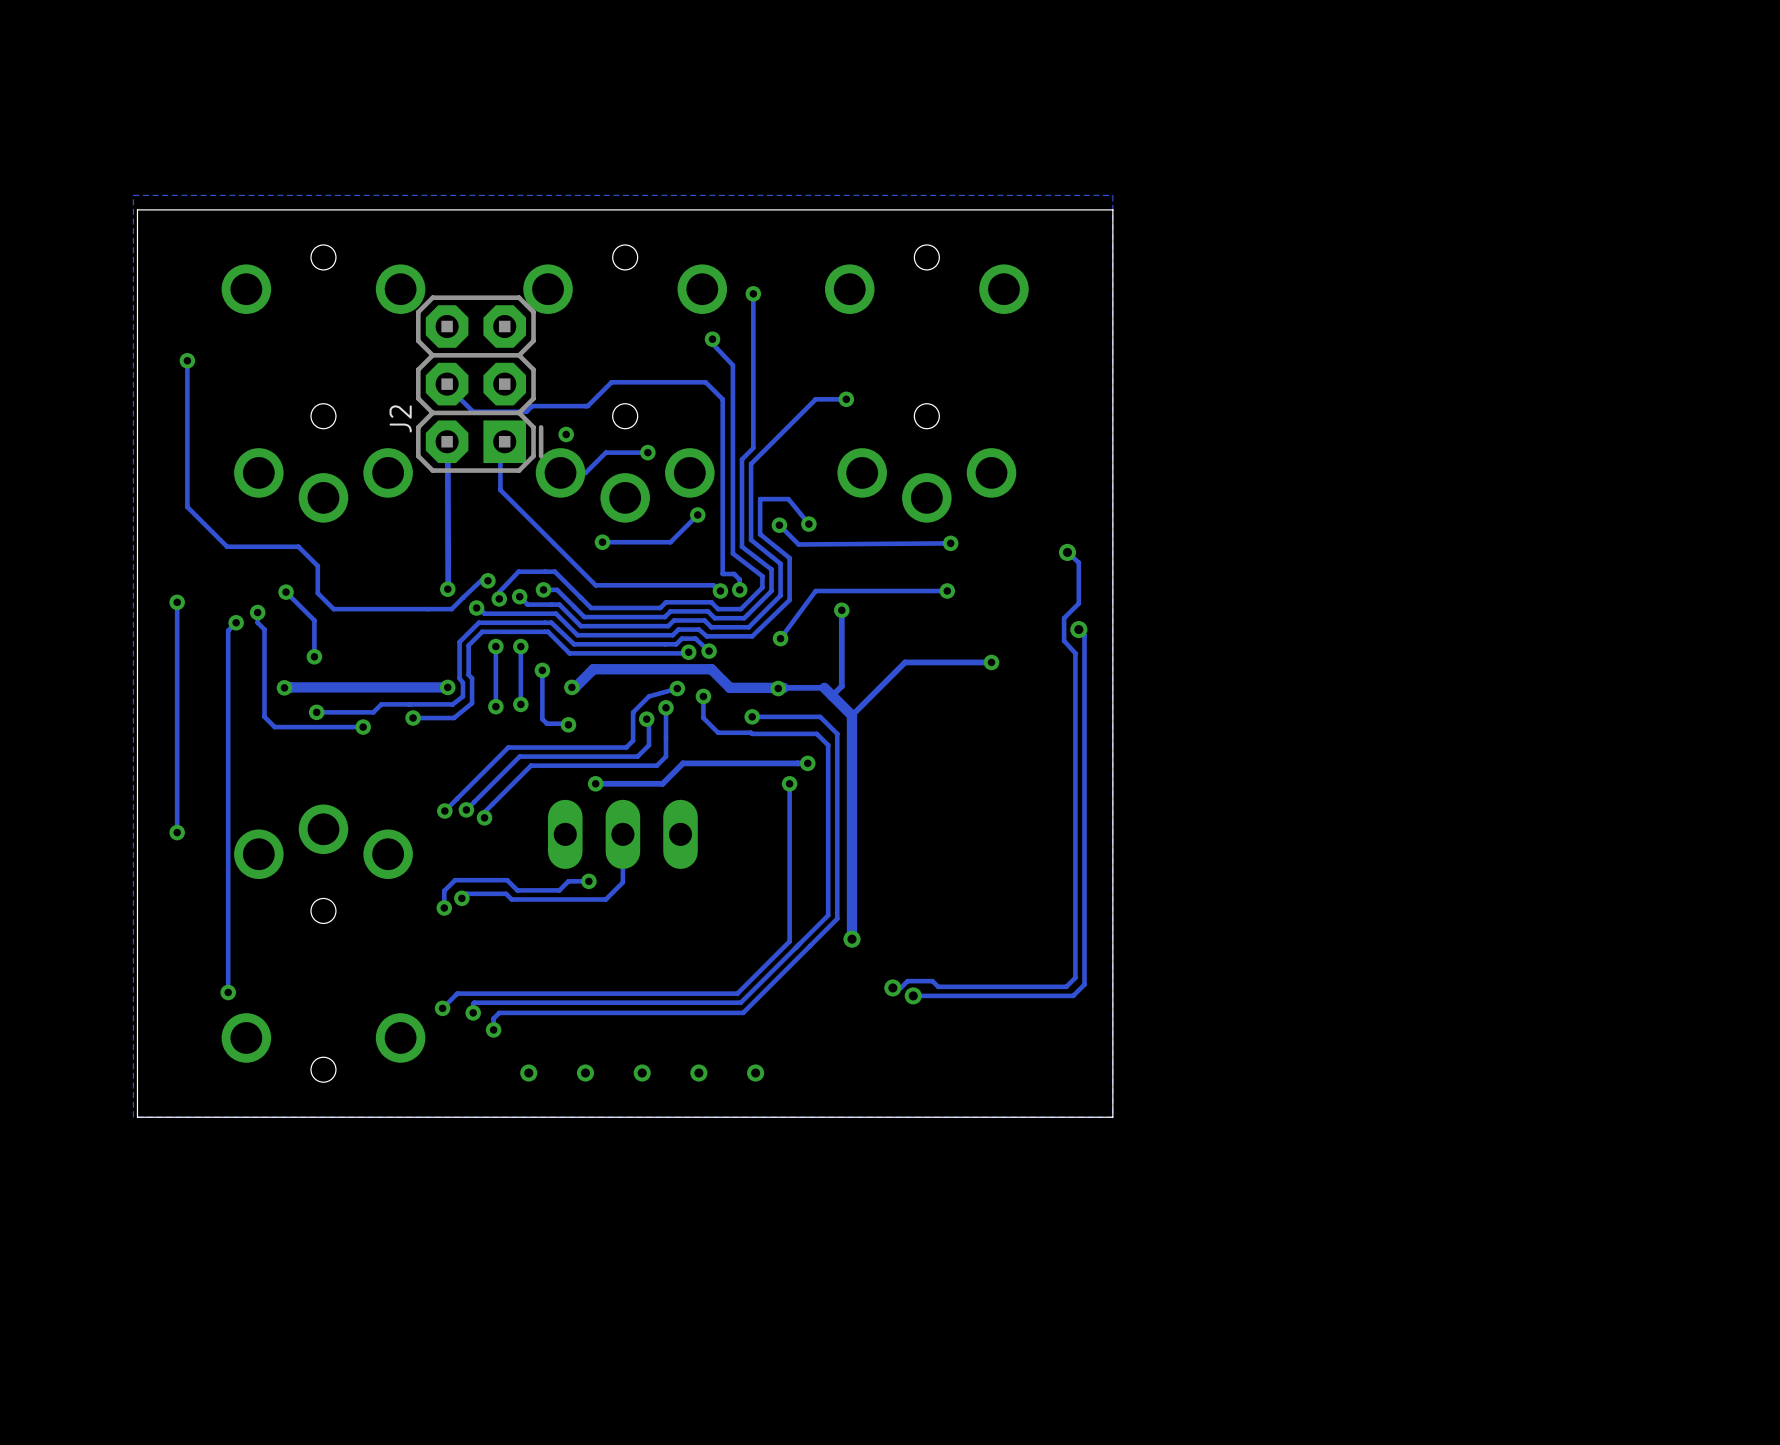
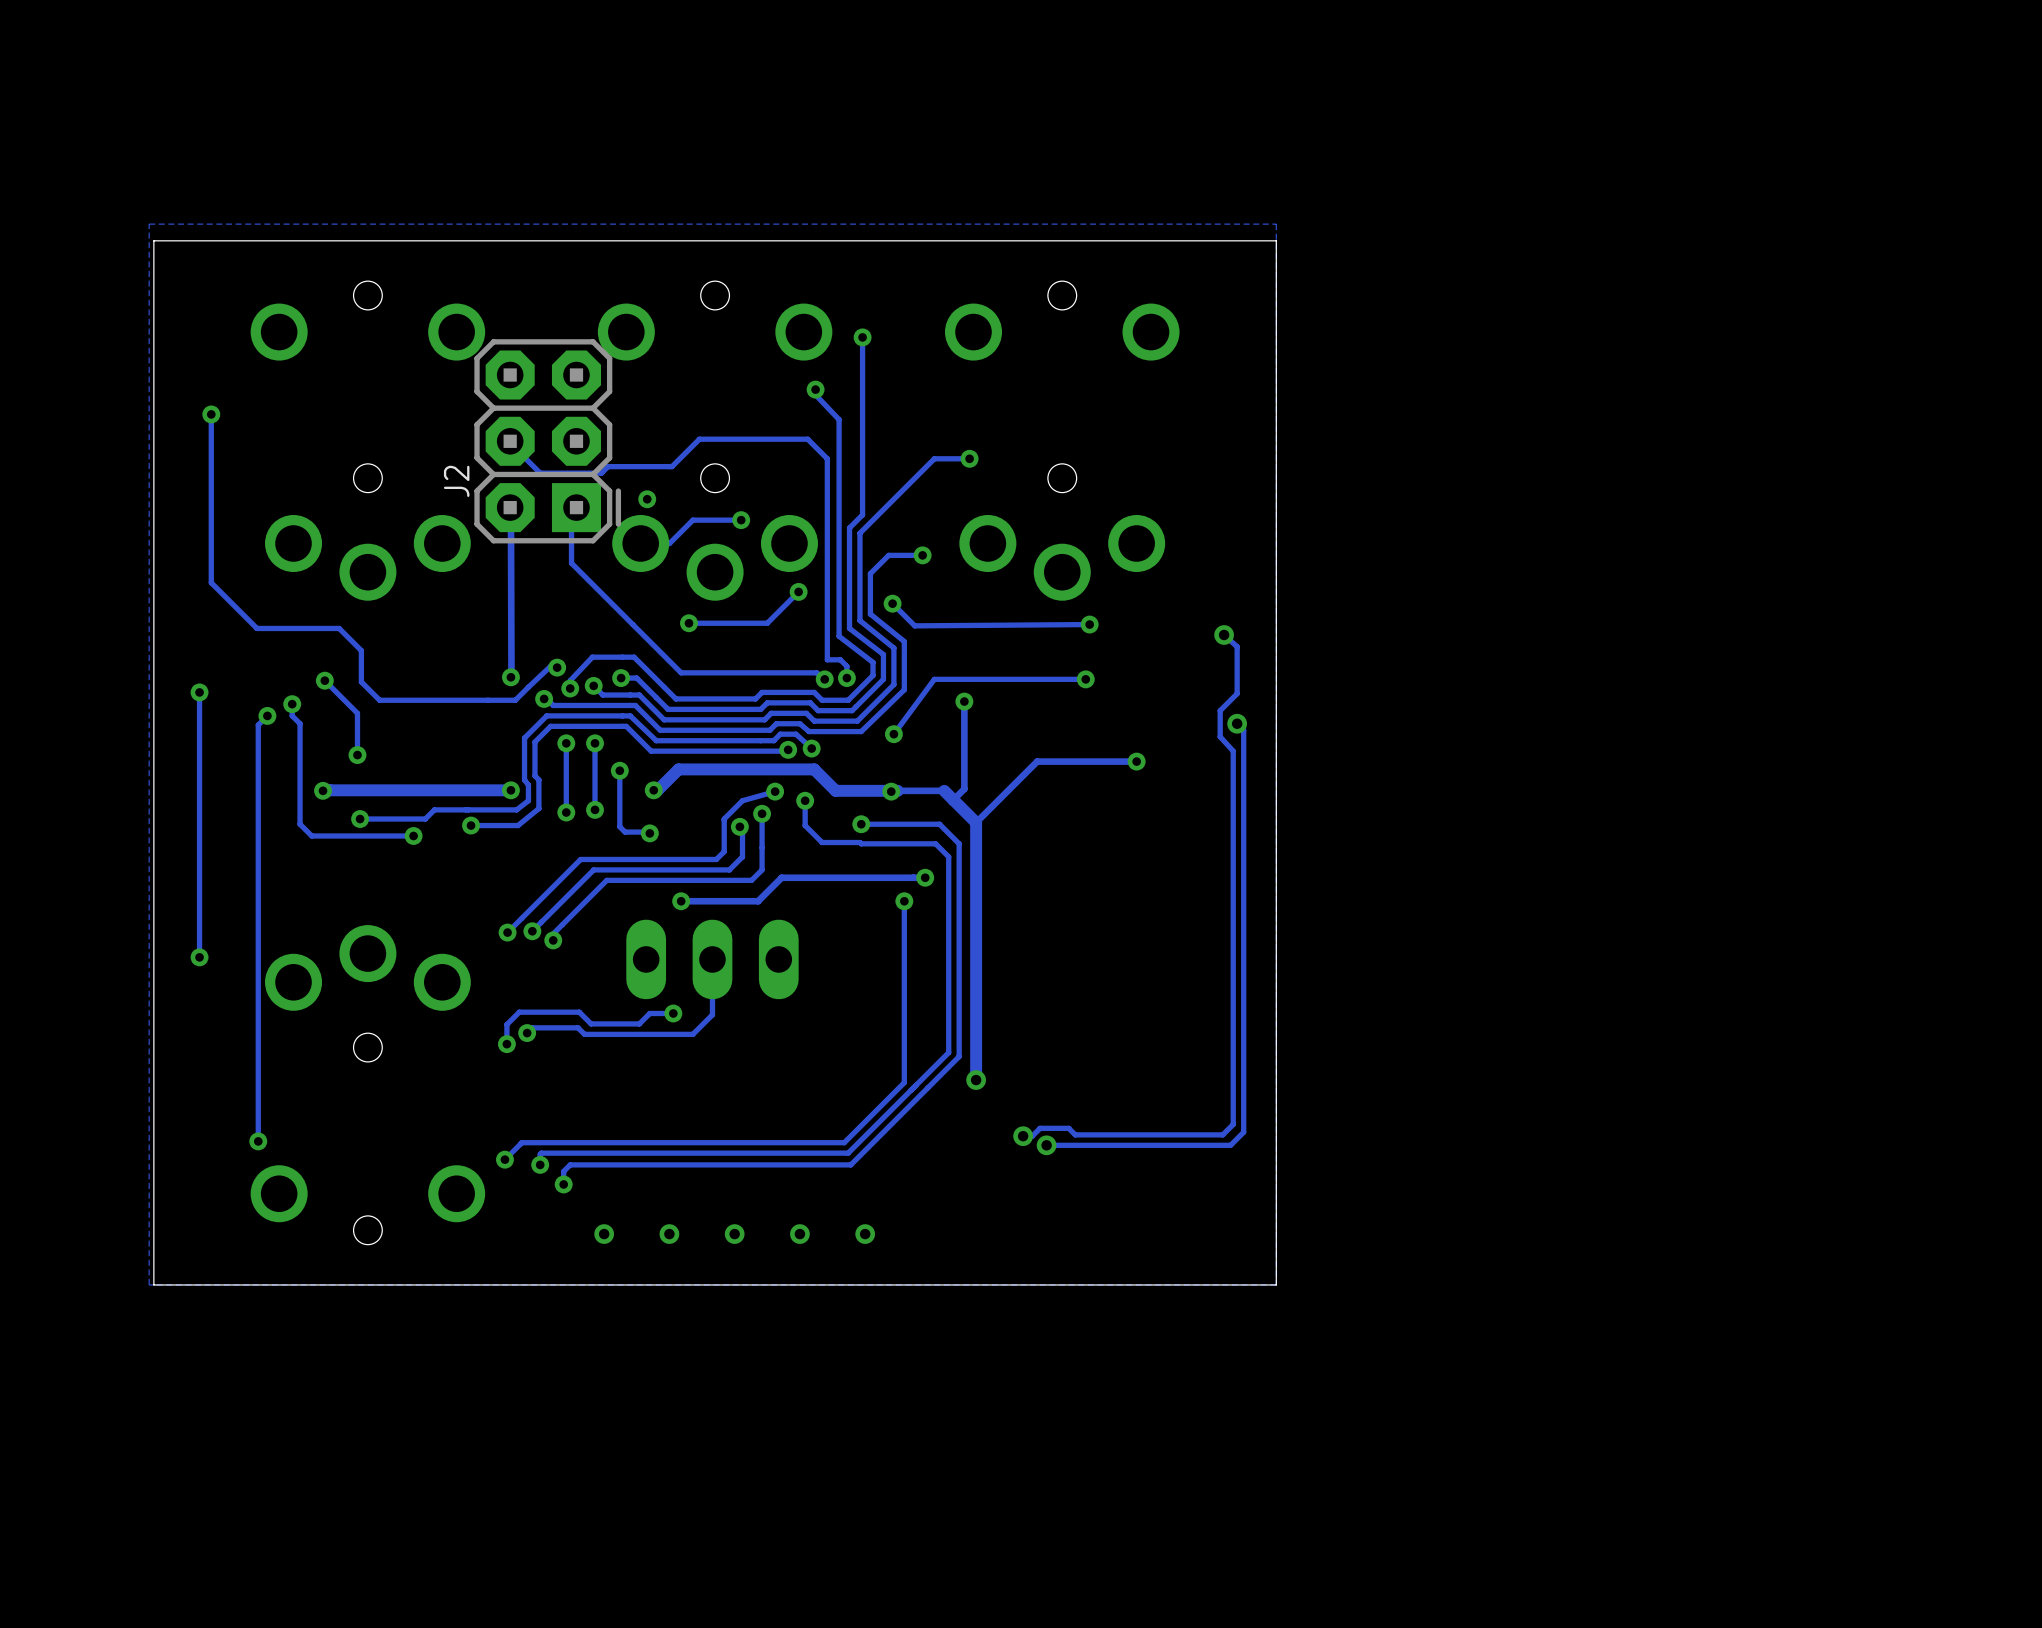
track: (760, 499) (788, 499) (808, 524) -> (870, 573) (888, 555) (922, 555)
via position: (808, 524) -> (922, 555)

